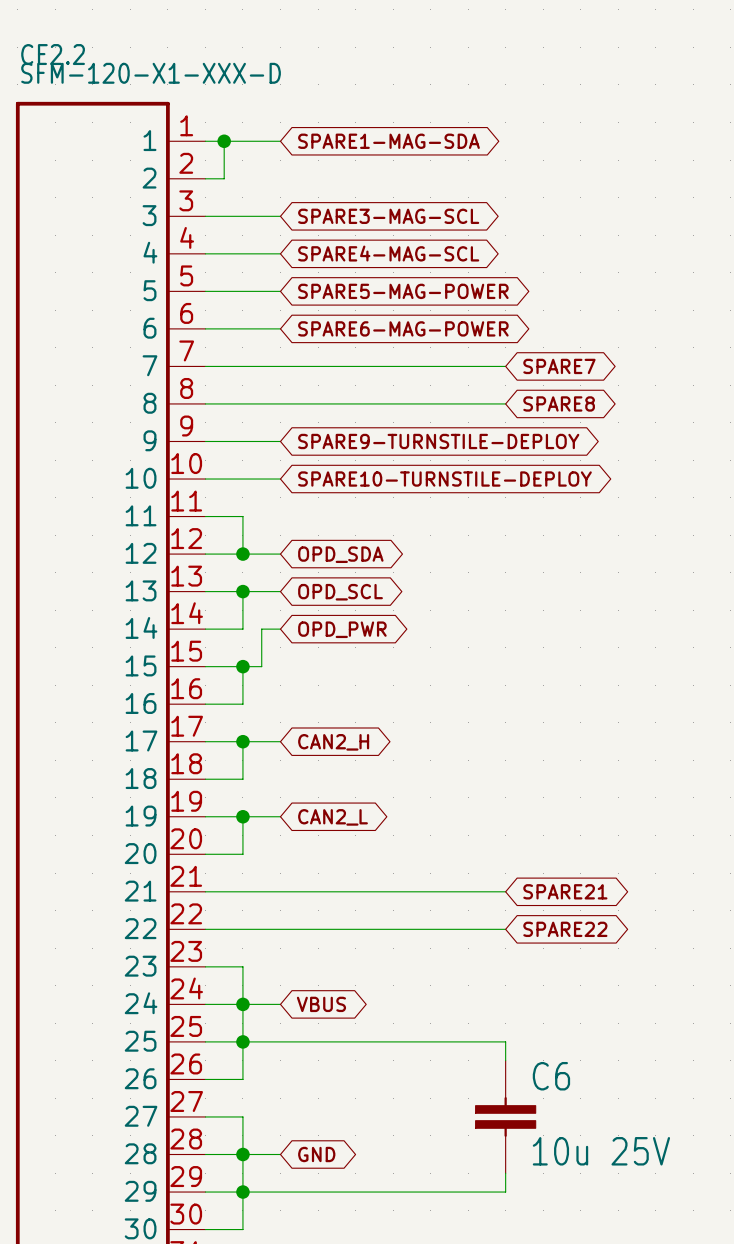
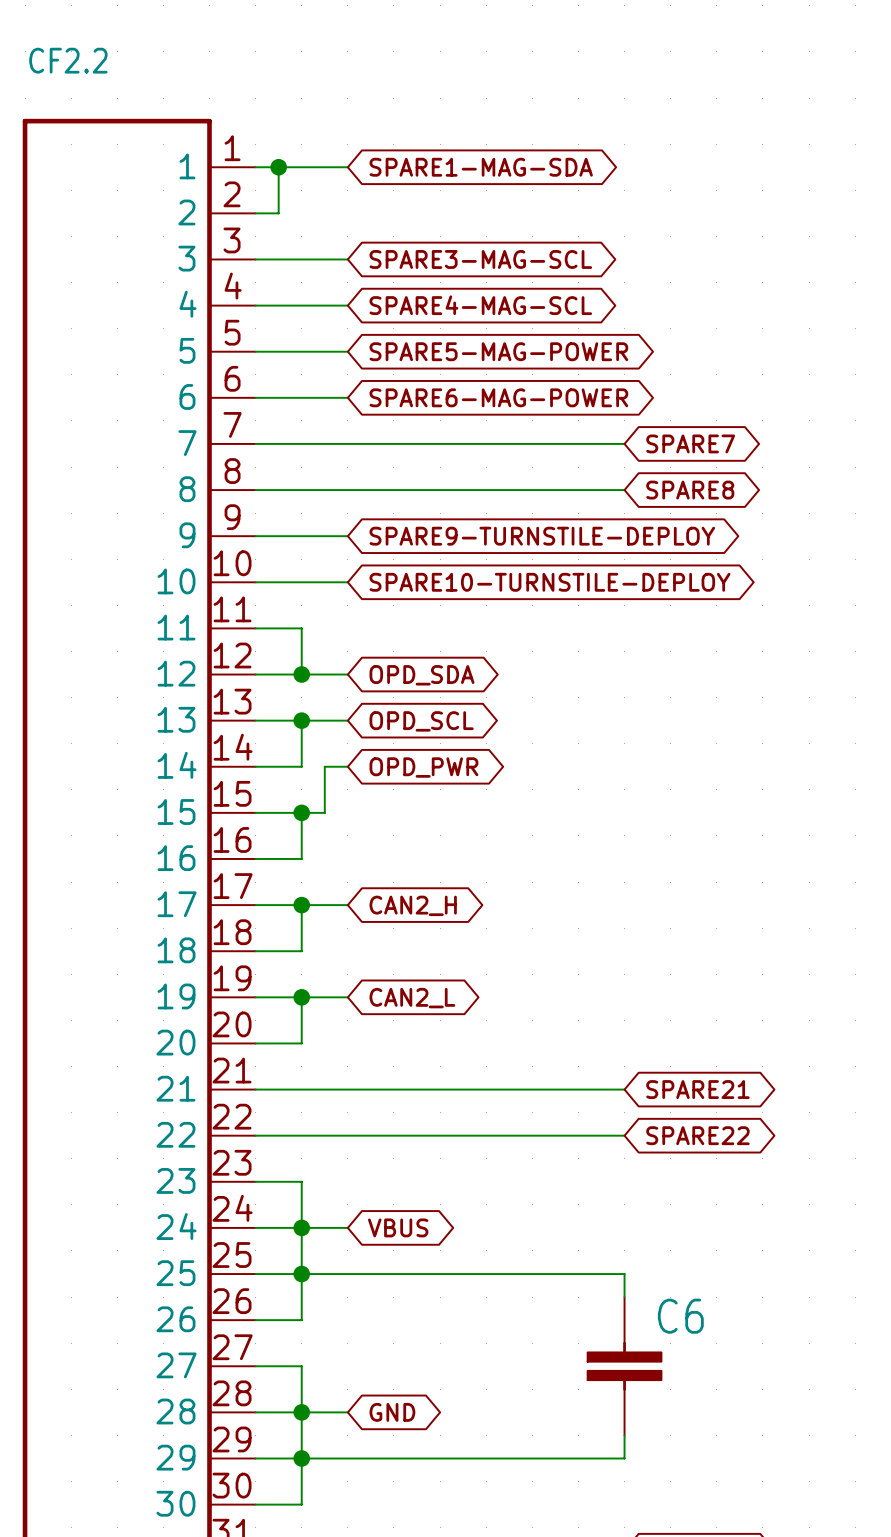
CF2.2 value: SFM-120-X1-XXX-D (151, 73) -> none
C6 value: 10u 25V (601, 1151) -> none

